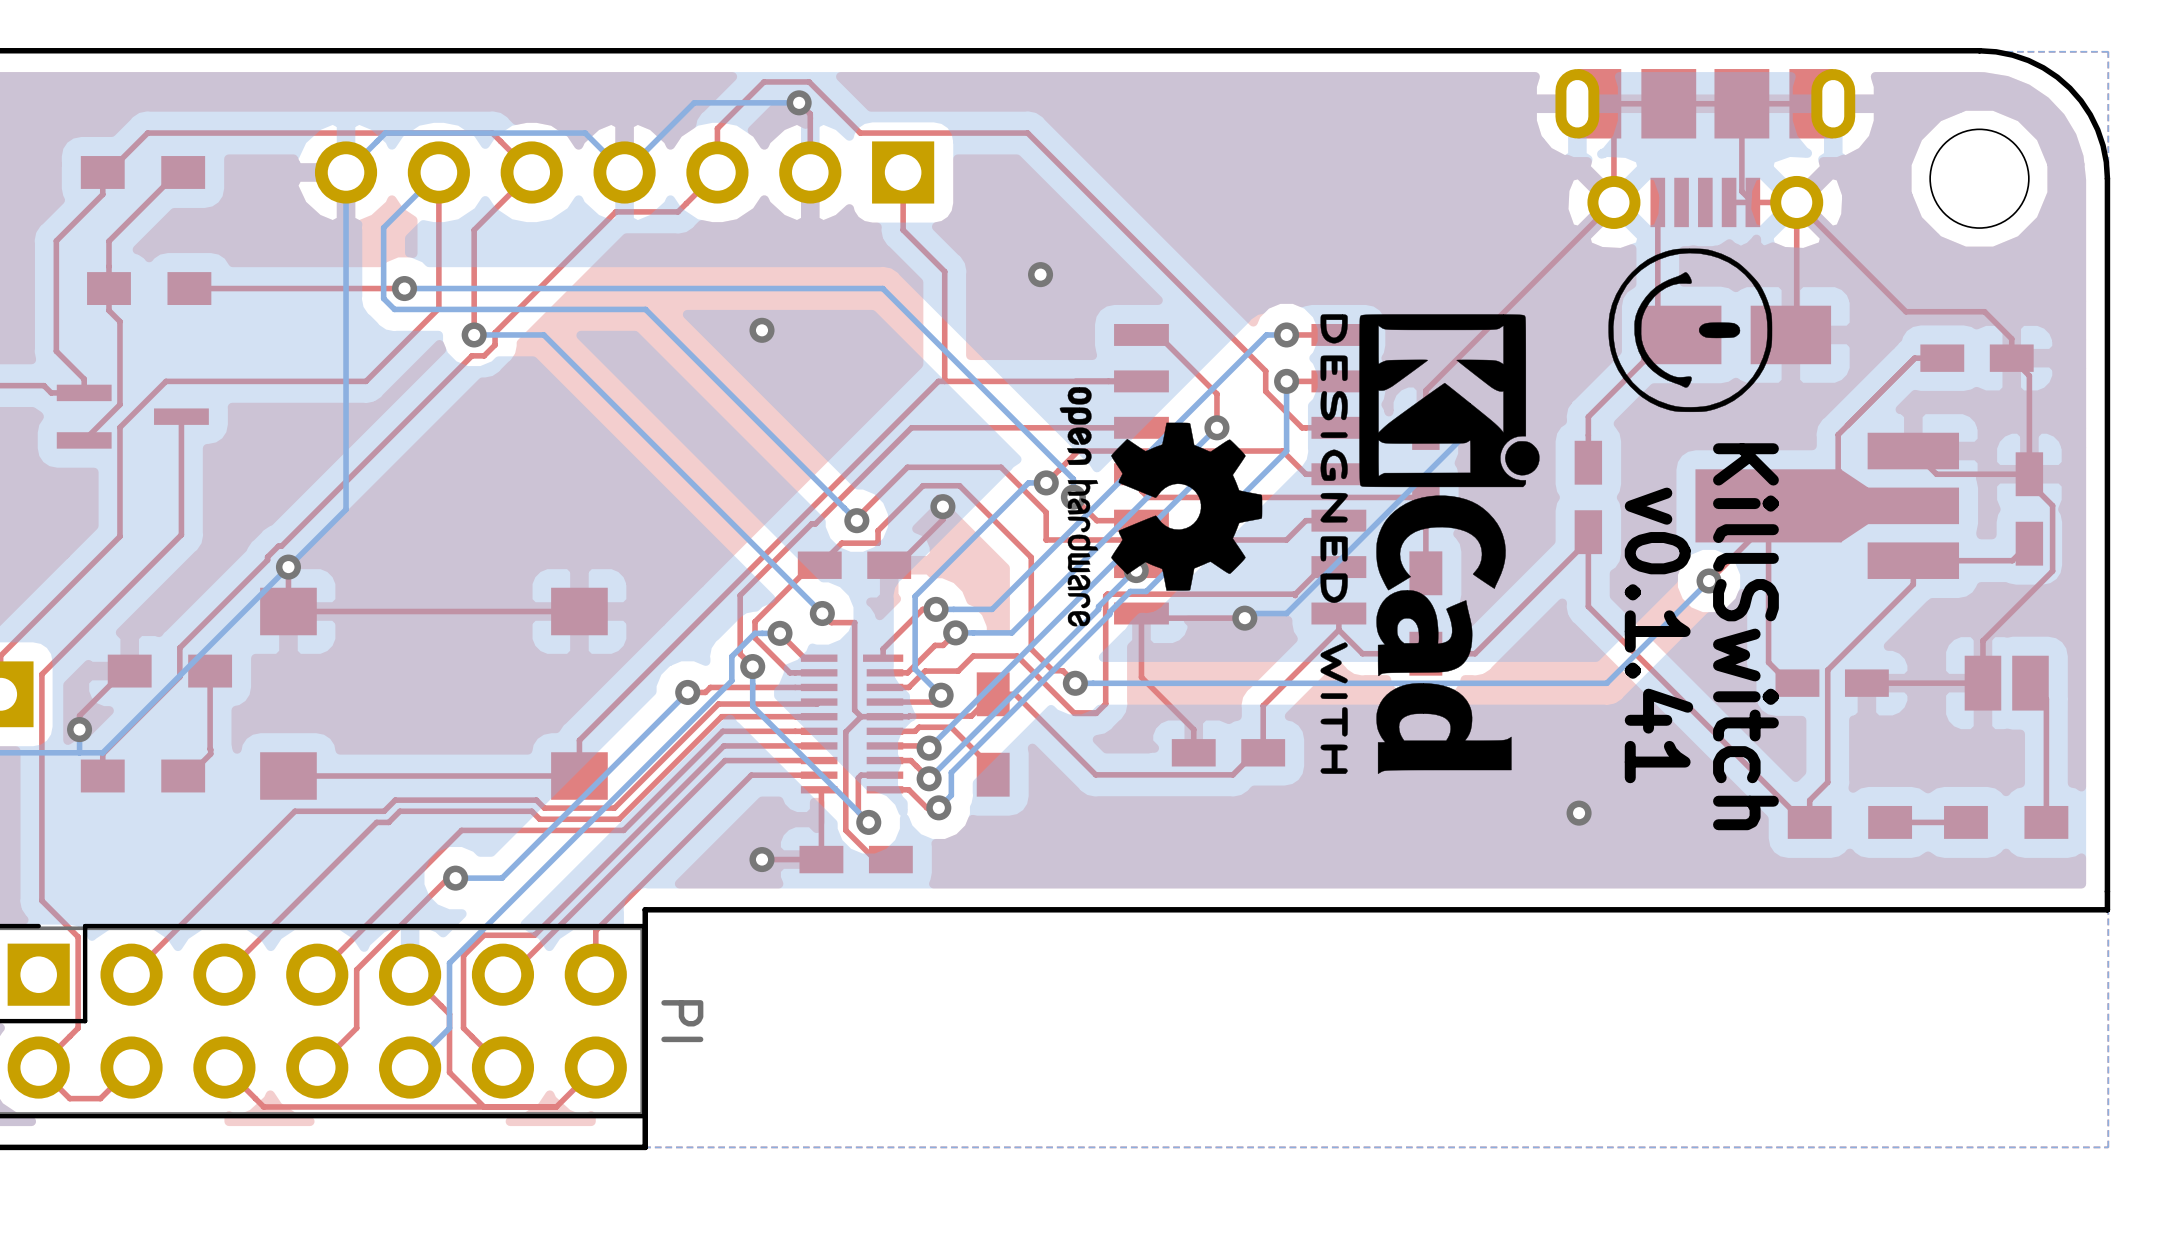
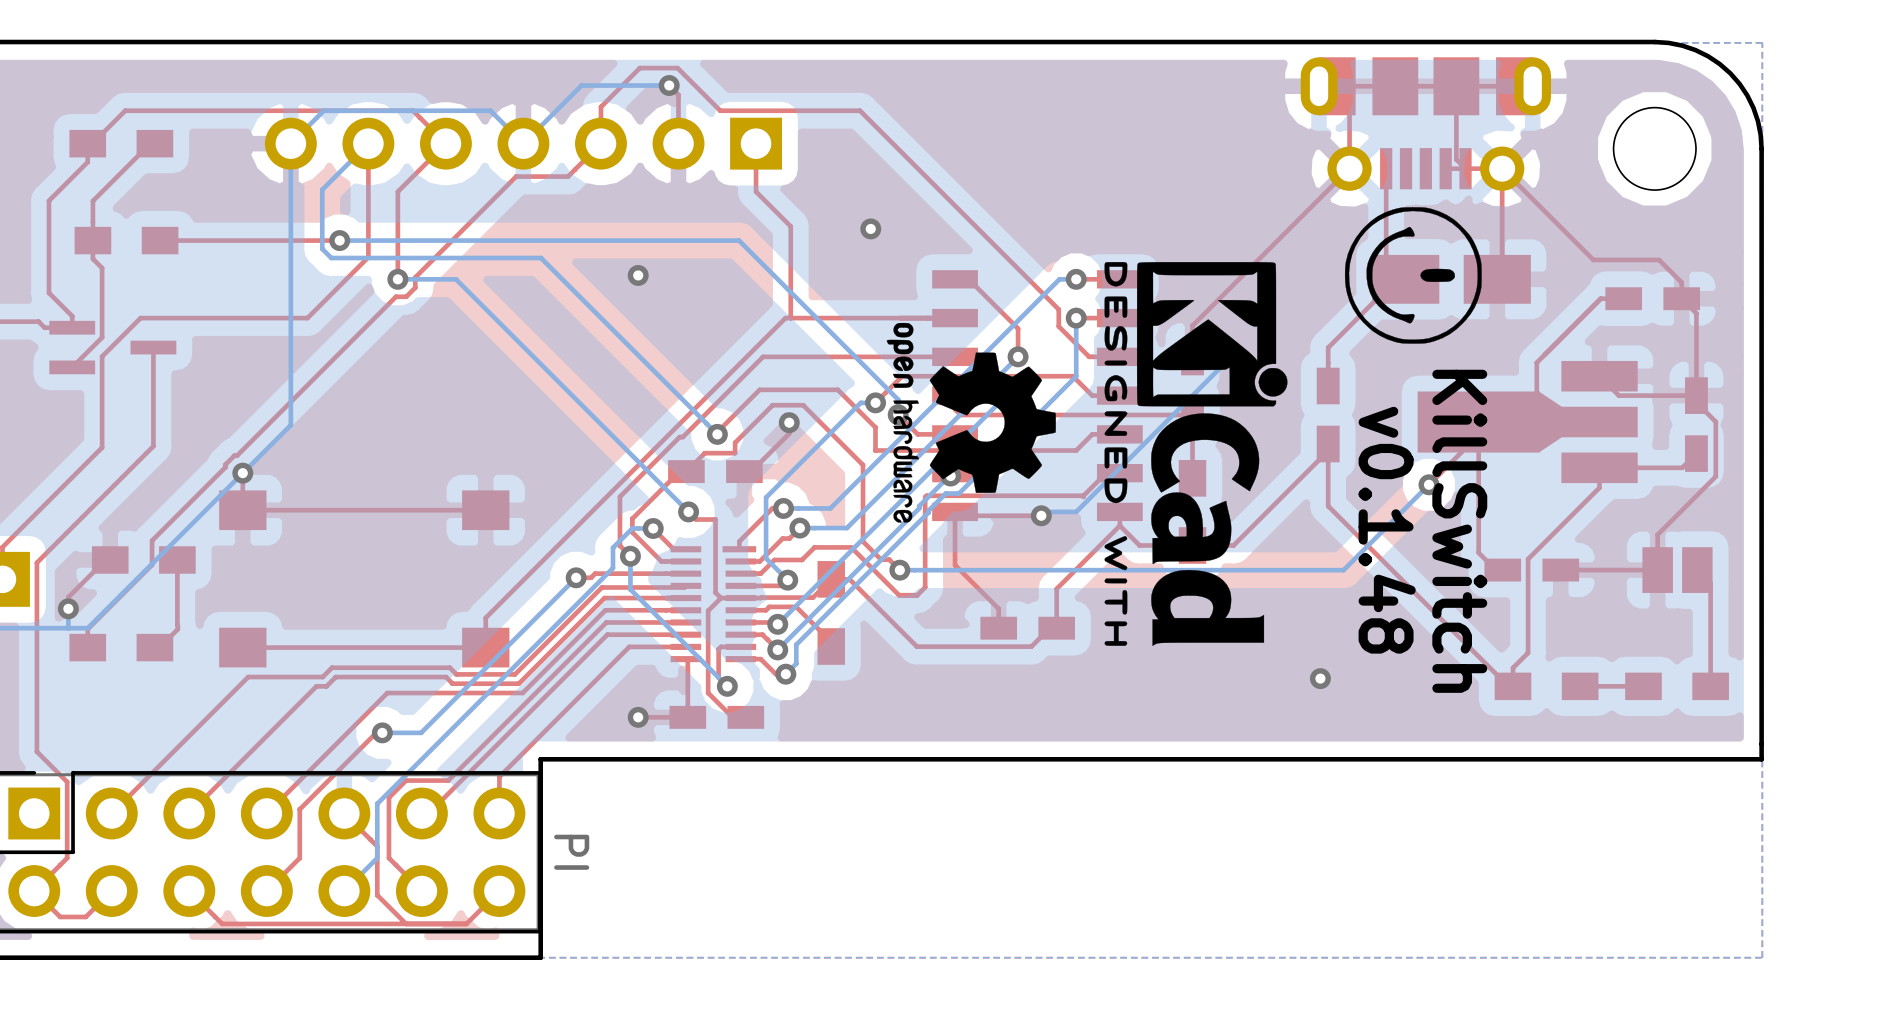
text: v0.1.41 (1658, 635) -> v0.1.48 (1387, 530)

